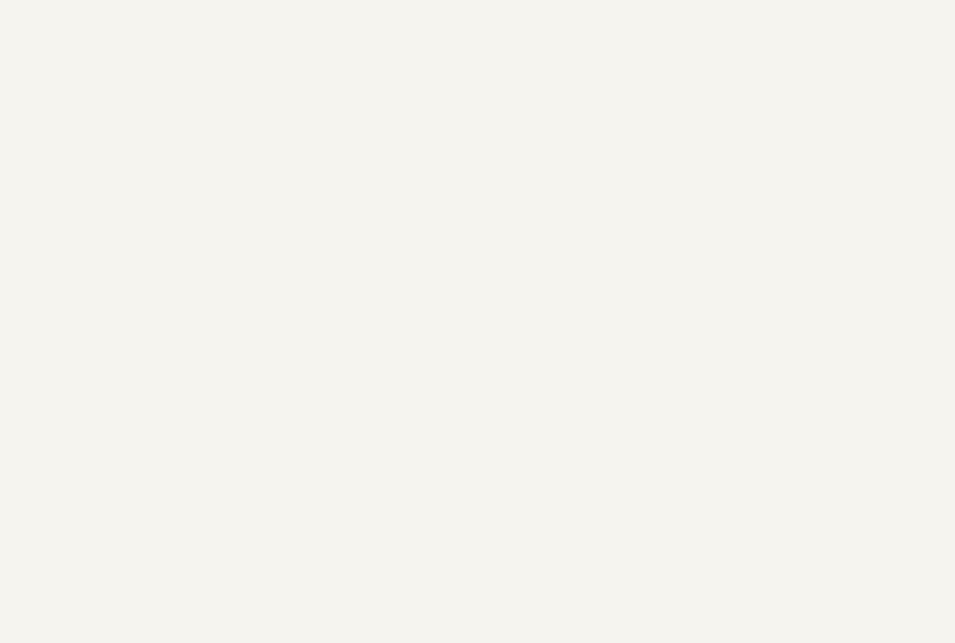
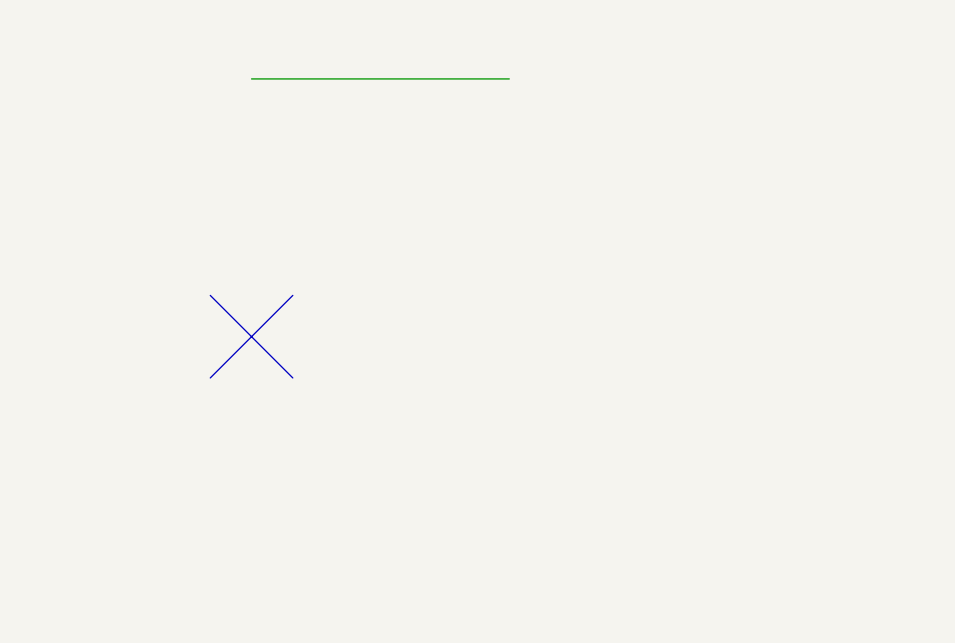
wire: none -> (251, 78) (509, 78)
no-connect mark: none -> (251, 336)

